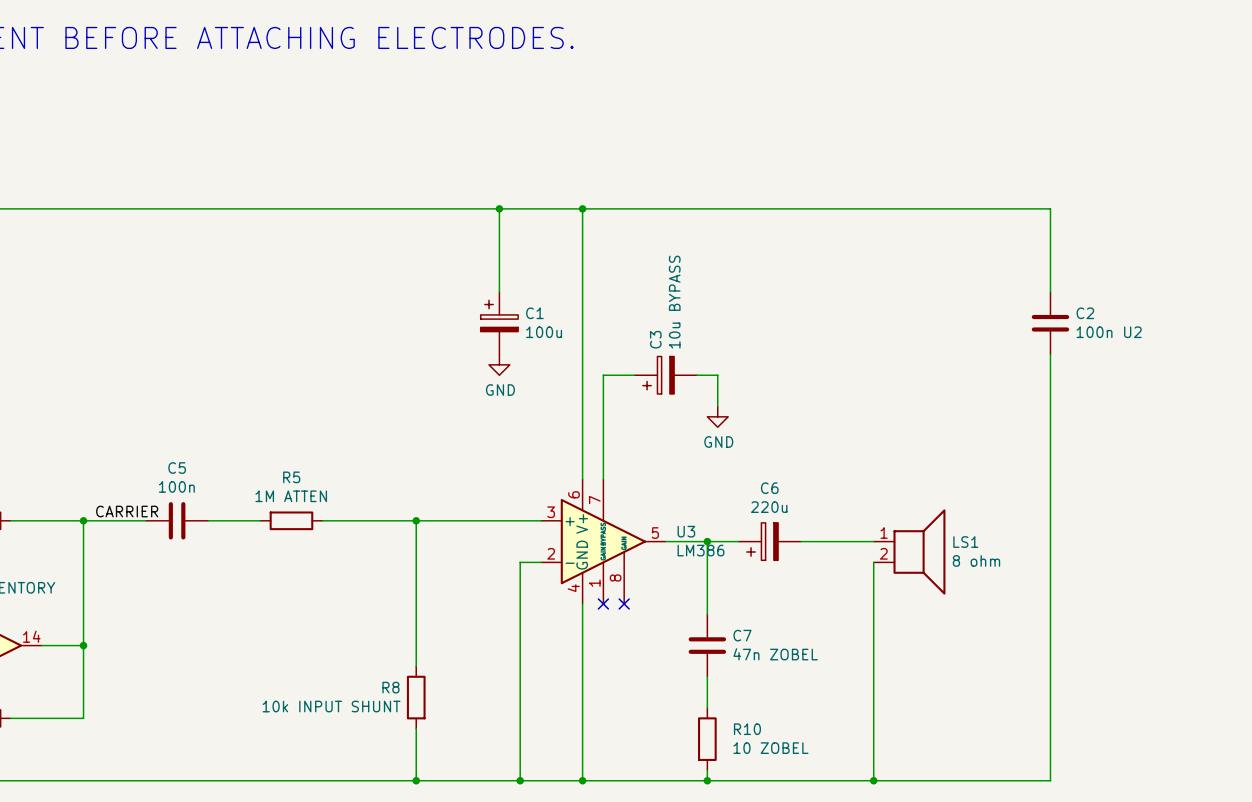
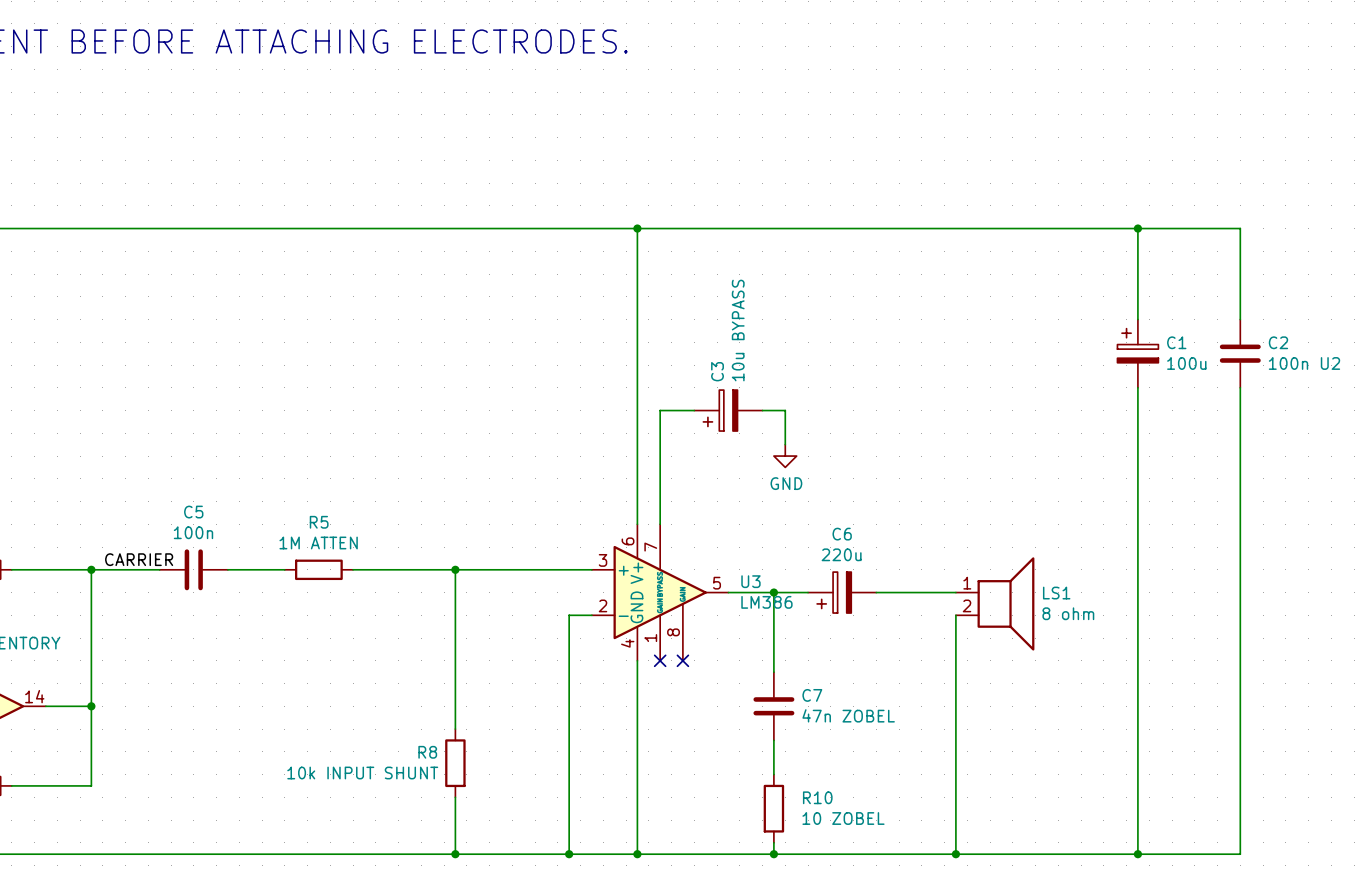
wire: (499, 208) (499, 292) -> none
junction: (499, 208) -> none
wire: none -> (1137, 228) (1137, 319)
junction: none -> (1137, 228)
wire: (1050, 208) (1050, 292) -> (1149, 228) (1240, 228) (1240, 319)
C1 position: (499, 323) -> (1137, 353)
C2 position: (1050, 323) -> (1240, 353)
wire: none -> (1137, 387) (1137, 854)
wire: (1050, 354) (1050, 780) -> (1240, 387) (1240, 854) (1149, 854)
power symbol: GND (499, 364) -> none
junction: none -> (1137, 854)

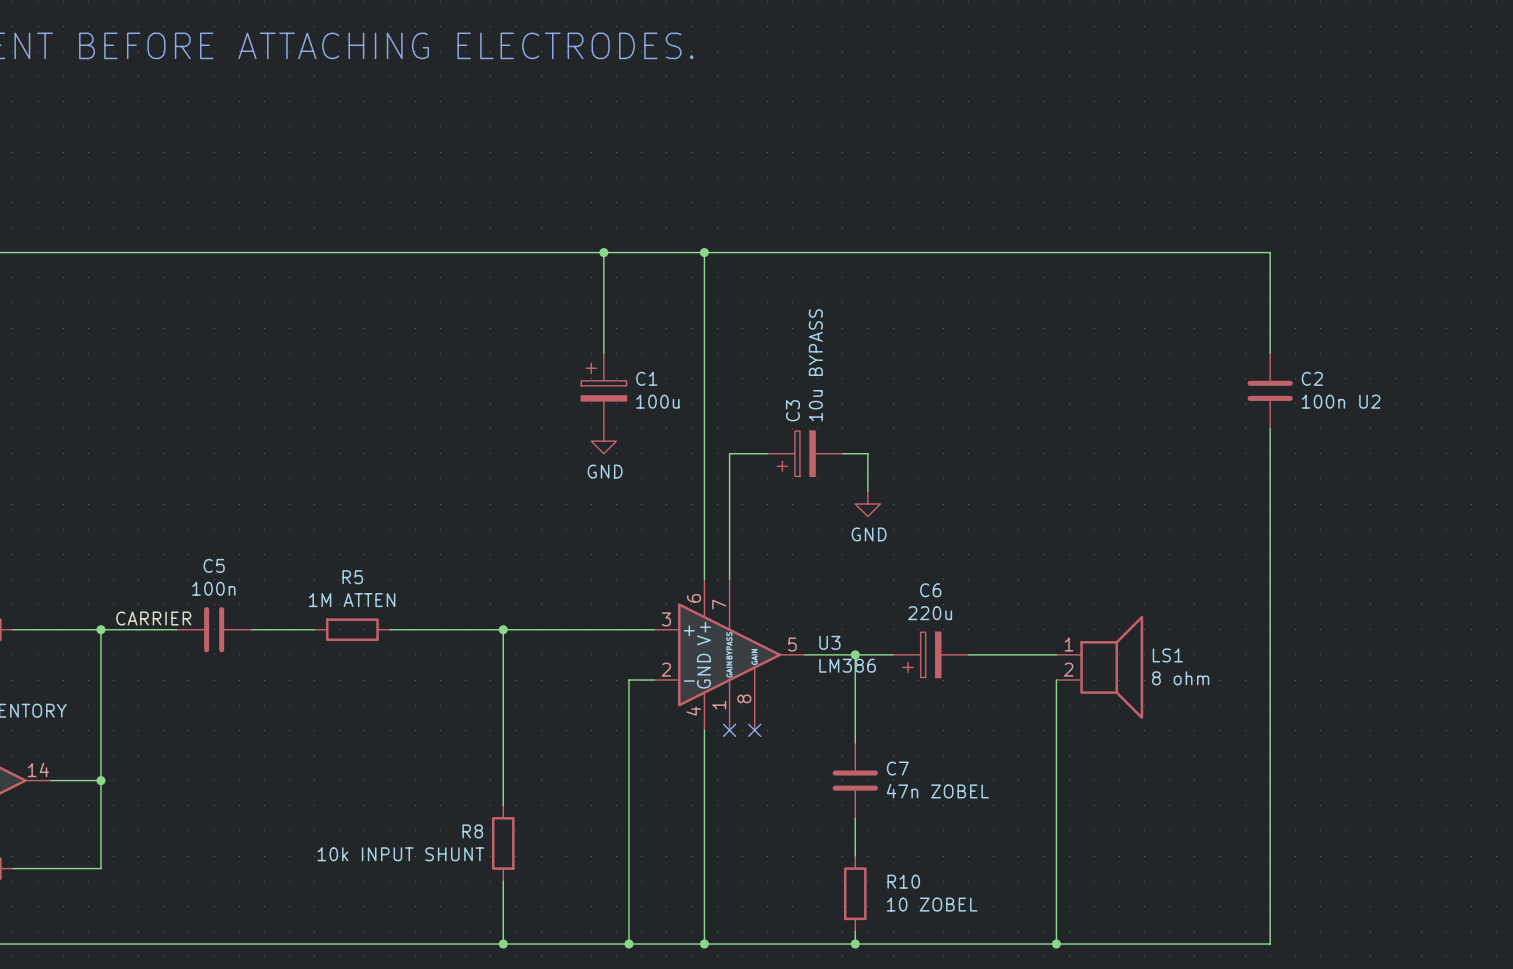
wire: none -> (603, 252) (603, 353)
junction: none -> (603, 252)
wire: (1137, 228) (1137, 319) -> none
junction: (1137, 228) -> none
wire: (1149, 228) (1240, 228) (1240, 319) -> (1270, 252) (1270, 353)
C1 position: (1137, 353) -> (603, 390)
C2 position: (1240, 353) -> (1270, 390)
wire: (1137, 387) (1137, 854) -> none
wire: (1240, 387) (1240, 854) (1149, 854) -> (1270, 428) (1270, 944)
power symbol: none -> GND (603, 441)
junction: (1137, 854) -> none

